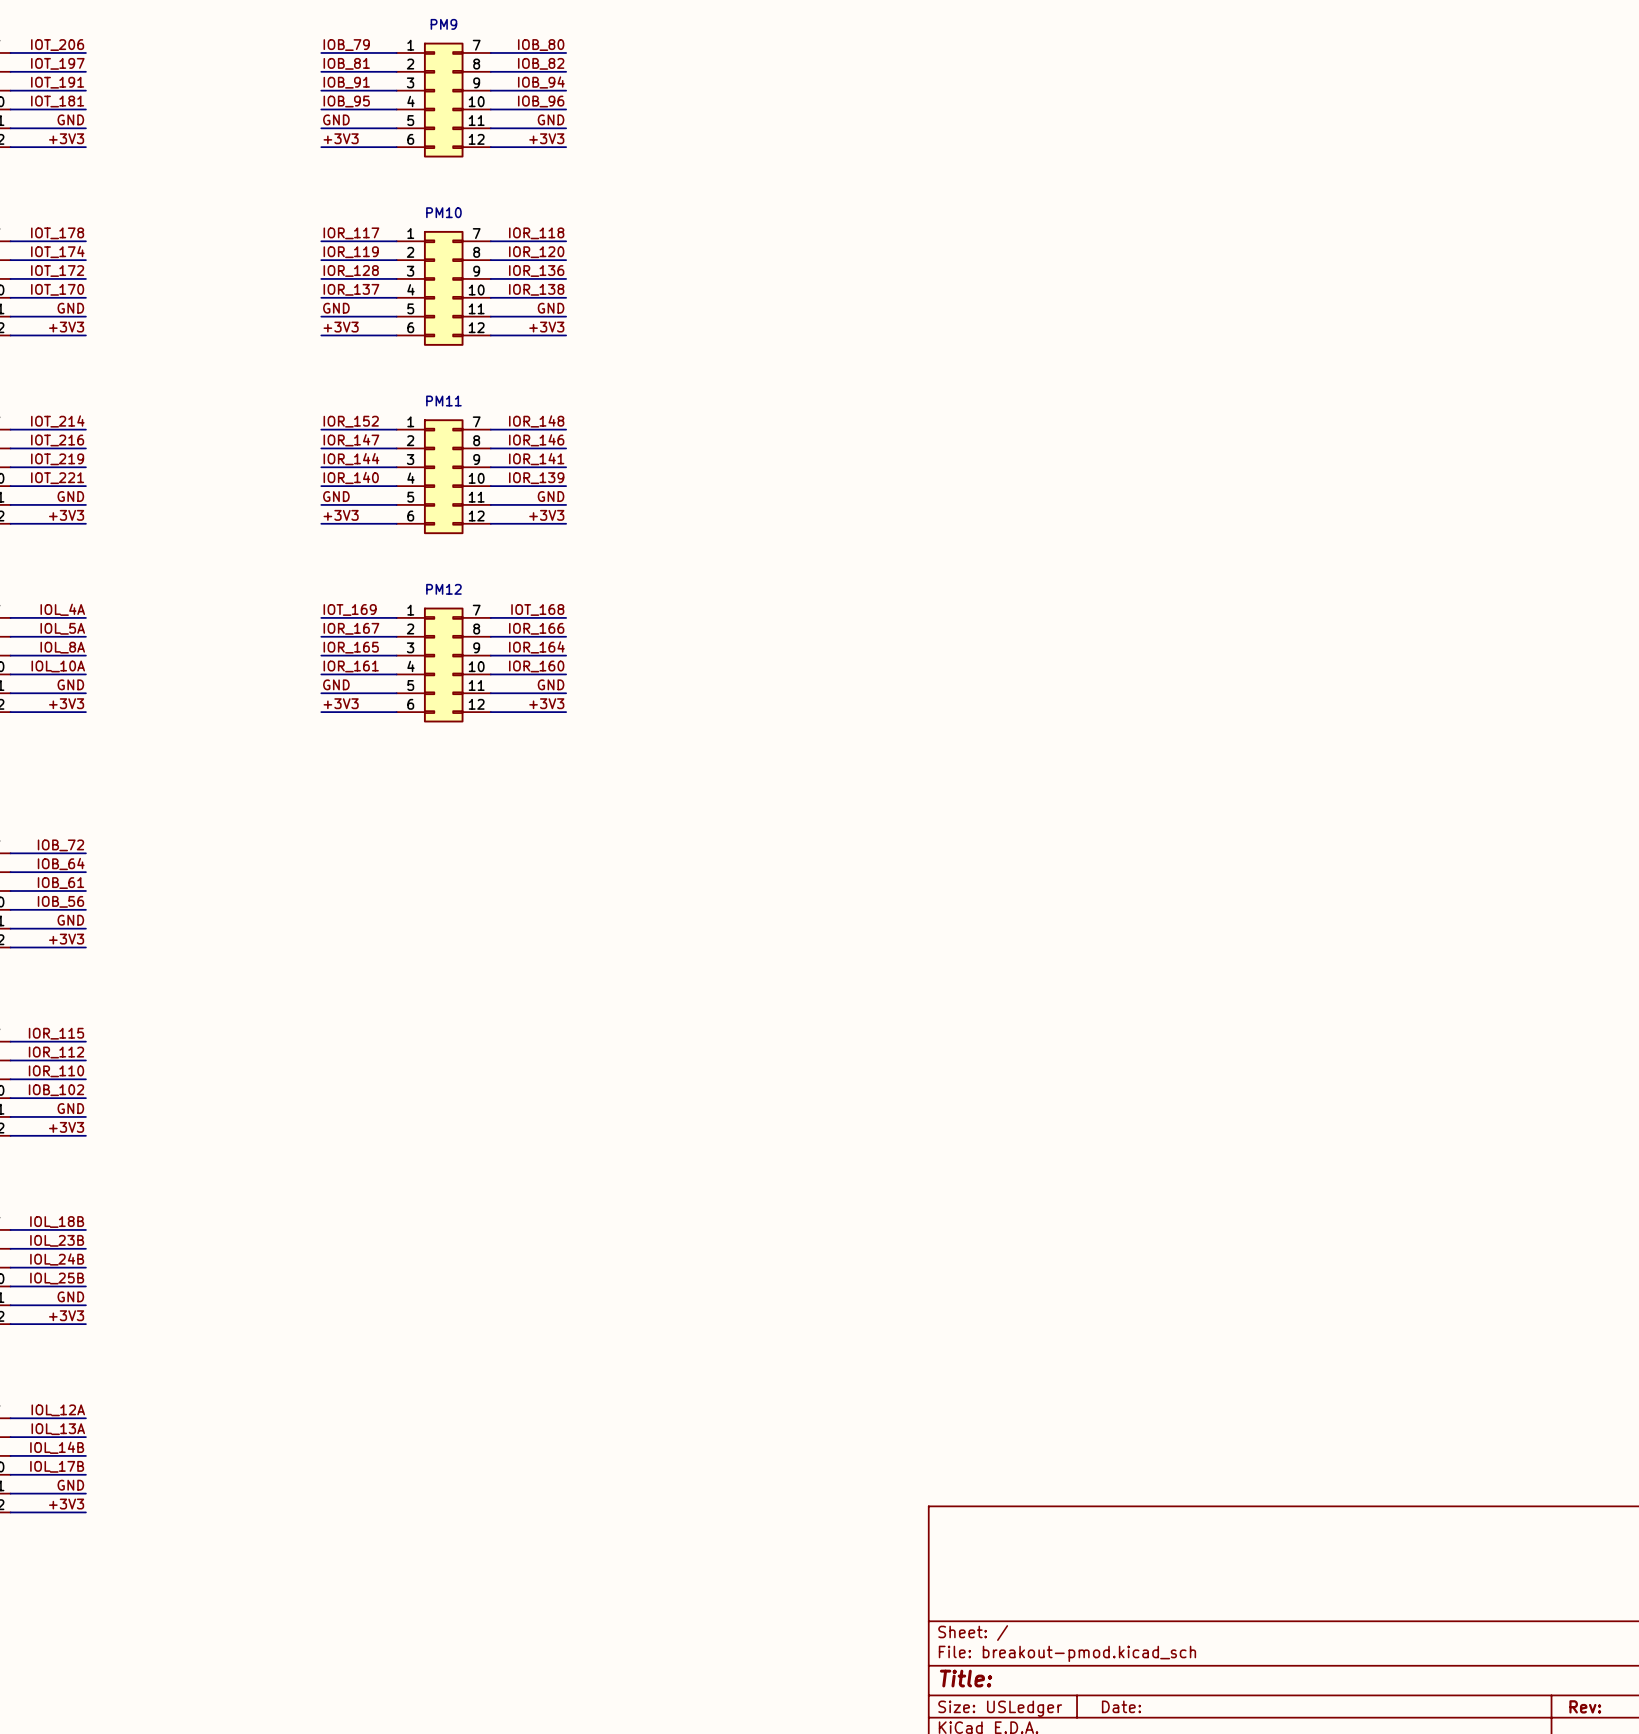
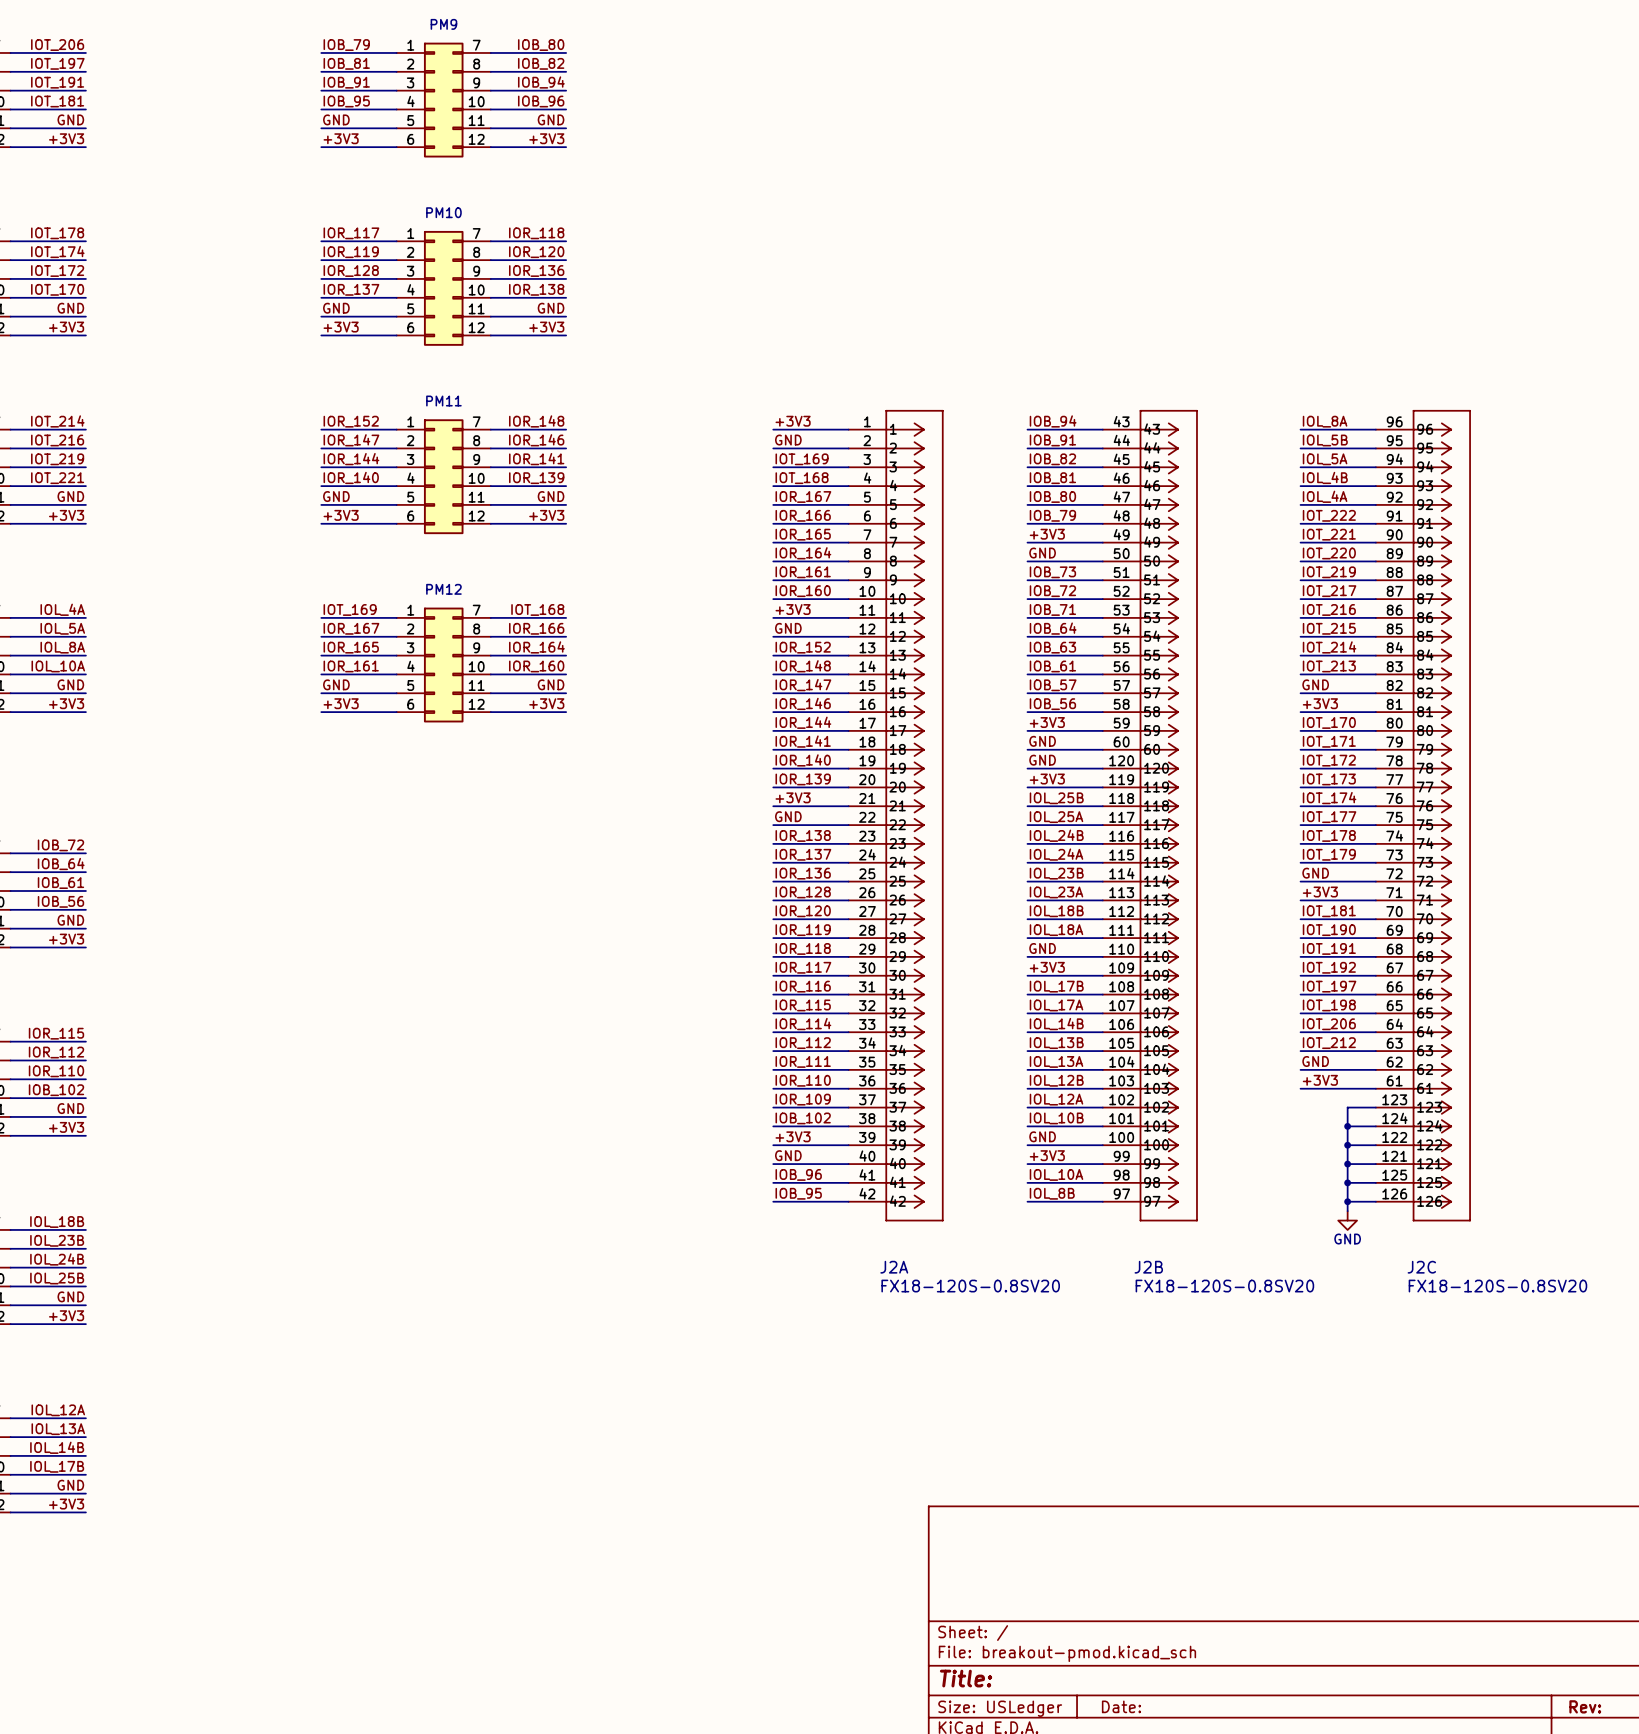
label: none -> +3V3 (793, 421)
label: none -> IOB_94 (1053, 421)
label: none -> IOL_8A (1325, 421)
wire: none -> (773, 429) (848, 429)
wire: none -> (1027, 429) (1102, 429)
wire: none -> (1300, 429) (1375, 429)
label: none -> GND (788, 440)
label: none -> IOB_91 (1052, 440)
label: none -> IOL_5B (1325, 440)
wire: none -> (773, 448) (848, 448)
wire: none -> (1027, 448) (1102, 448)
wire: none -> (1300, 448) (1375, 448)
label: none -> IOT_169 (802, 459)
label: none -> IOB_82 (1052, 459)
label: none -> IOL_5A (1325, 459)
wire: none -> (773, 467) (848, 467)
wire: none -> (1027, 467) (1102, 467)
wire: none -> (1300, 467) (1375, 467)
label: none -> IOL_4B (1325, 477)
label: none -> IOT_168 (802, 478)
label: none -> IOB_81 (1052, 478)
wire: none -> (773, 486) (848, 486)
wire: none -> (1027, 486) (1102, 486)
wire: none -> (1300, 486) (1375, 486)
label: none -> IOR_167 (803, 496)
label: none -> IOB_80 (1052, 496)
label: none -> IOL_4A (1325, 496)
wire: none -> (773, 504) (848, 504)
wire: none -> (1027, 504) (1102, 504)
wire: none -> (1300, 504) (1375, 504)
label: none -> IOR_166 (803, 515)
label: none -> IOB_79 (1052, 515)
label: none -> IOT_222 (1329, 515)
wire: none -> (773, 523) (848, 523)
wire: none -> (1027, 523) (1102, 523)
wire: none -> (1300, 523) (1375, 523)
label: none -> IOR_165 (803, 534)
label: none -> +3V3 (1047, 534)
label: none -> IOT_221 (1329, 534)
wire: none -> (773, 542) (848, 542)
wire: none -> (1027, 542) (1102, 542)
wire: none -> (1300, 542) (1375, 542)
label: none -> IOR_164 (803, 553)
label: none -> GND (1042, 553)
label: none -> IOT_220 (1329, 553)
wire: none -> (773, 561) (848, 561)
wire: none -> (1027, 561) (1102, 561)
wire: none -> (1300, 561) (1375, 561)
label: none -> IOR_161 (803, 572)
label: none -> IOB_73 (1052, 572)
label: none -> IOT_219 (1329, 572)
wire: none -> (773, 580) (848, 580)
wire: none -> (1027, 580) (1102, 580)
wire: none -> (1300, 580) (1375, 580)
label: none -> IOR_160 (803, 591)
label: none -> IOB_72 (1052, 591)
label: none -> IOT_217 (1329, 591)
wire: none -> (773, 599) (848, 599)
wire: none -> (1027, 599) (1102, 599)
wire: none -> (1300, 599) (1375, 599)
label: none -> +3V3 (793, 609)
label: none -> IOB_71 (1052, 609)
label: none -> IOT_216 (1329, 609)
wire: none -> (773, 617) (848, 617)
wire: none -> (1027, 617) (1102, 617)
wire: none -> (1300, 617) (1375, 617)
label: none -> GND (788, 628)
label: none -> IOB_64 (1053, 628)
label: none -> IOT_215 (1329, 628)
wire: none -> (773, 636) (848, 636)
wire: none -> (1027, 636) (1102, 636)
wire: none -> (1300, 636) (1375, 636)
label: none -> IOR_152 (803, 647)
label: none -> IOB_63 (1052, 647)
label: none -> IOT_214 (1329, 647)
wire: none -> (773, 655) (848, 655)
wire: none -> (1027, 655) (1102, 655)
wire: none -> (1300, 655) (1375, 655)
label: none -> IOR_148 (803, 666)
label: none -> IOB_61 (1052, 666)
label: none -> IOT_213 (1329, 666)
wire: none -> (773, 674) (848, 674)
wire: none -> (1027, 674) (1102, 674)
wire: none -> (1300, 674) (1375, 674)
label: none -> GND (1315, 684)
label: none -> IOR_147 (803, 685)
label: none -> IOB_57 (1053, 685)
wire: none -> (773, 693) (848, 693)
wire: none -> (1027, 693) (1102, 693)
wire: none -> (1300, 693) (1375, 693)
label: none -> IOR_146 (803, 703)
label: none -> +3V3 (1320, 703)
label: none -> IOB_56 (1052, 704)
wire: none -> (773, 712) (848, 712)
wire: none -> (1027, 712) (1102, 712)
wire: none -> (1300, 712) (1375, 712)
label: none -> IOR_144 (803, 722)
label: none -> +3V3 (1047, 722)
label: none -> IOT_170 (1329, 722)
wire: none -> (773, 730) (848, 730)
wire: none -> (1027, 730) (1102, 730)
wire: none -> (1300, 730) (1375, 730)
label: none -> IOR_141 (803, 741)
label: none -> GND (1042, 741)
label: none -> IOT_171 (1329, 741)
wire: none -> (773, 749) (848, 749)
wire: none -> (1027, 749) (1102, 749)
wire: none -> (1300, 749) (1375, 749)
label: none -> IOR_140 (803, 760)
label: none -> GND (1042, 760)
label: none -> IOT_172 (1329, 760)
wire: none -> (773, 768) (848, 768)
wire: none -> (1027, 768) (1102, 768)
wire: none -> (1300, 768) (1375, 768)
label: none -> IOR_139 (803, 779)
label: none -> +3V3 (1047, 779)
label: none -> IOT_173 (1329, 779)
wire: none -> (773, 787) (848, 787)
wire: none -> (1027, 787) (1102, 787)
wire: none -> (1300, 787) (1375, 787)
label: none -> +3V3 (793, 797)
label: none -> IOL_25B (1056, 798)
label: none -> IOT_174 (1329, 798)
wire: none -> (773, 806) (848, 806)
wire: none -> (1027, 806) (1102, 806)
wire: none -> (1300, 806) (1375, 806)
J2A: none -> FX18-120S-0.8SV20 (895, 815)
J2B: none -> FX18-120S-0.8SV20 (1150, 815)
J2C: none -> FX18-120S-0.8SV20 (1423, 815)
label: none -> GND (788, 816)
label: none -> IOL_25A (1056, 817)
label: none -> IOT_177 (1329, 817)
wire: none -> (773, 825) (848, 825)
wire: none -> (1027, 825) (1102, 825)
wire: none -> (1300, 825) (1375, 825)
label: none -> IOR_138 (803, 835)
label: none -> IOL_24B (1056, 835)
label: none -> IOT_178 (1329, 835)
wire: none -> (773, 843) (848, 843)
wire: none -> (1027, 843) (1102, 843)
wire: none -> (1300, 843) (1375, 843)
label: none -> IOR_137 (803, 854)
label: none -> IOL_24A (1056, 854)
label: none -> IOT_179 (1329, 854)
wire: none -> (773, 862) (848, 862)
wire: none -> (1027, 862) (1102, 862)
wire: none -> (1300, 862) (1375, 862)
label: none -> IOR_136 (803, 873)
label: none -> IOL_23B (1056, 873)
label: none -> GND (1315, 873)
wire: none -> (773, 881) (848, 881)
wire: none -> (1027, 881) (1102, 881)
wire: none -> (1300, 881) (1375, 881)
label: none -> IOR_128 (803, 892)
label: none -> IOL_23A (1056, 892)
label: none -> +3V3 (1320, 892)
wire: none -> (773, 900) (848, 900)
wire: none -> (1027, 900) (1102, 900)
wire: none -> (1300, 900) (1375, 900)
label: none -> IOR_120 (803, 911)
label: none -> IOL_18B (1056, 911)
label: none -> IOT_181 (1329, 911)
wire: none -> (773, 919) (848, 919)
wire: none -> (1027, 919) (1102, 919)
wire: none -> (1300, 919) (1375, 919)
label: none -> IOR_119 (803, 930)
label: none -> IOL_18A (1056, 930)
label: none -> IOT_190 (1329, 930)
wire: none -> (773, 938) (848, 938)
wire: none -> (1027, 938) (1102, 938)
wire: none -> (1300, 938) (1375, 938)
label: none -> IOR_118 (803, 948)
label: none -> GND (1042, 948)
label: none -> IOT_191 (1329, 948)
wire: none -> (773, 956) (848, 956)
wire: none -> (1027, 956) (1102, 956)
wire: none -> (1300, 956) (1375, 956)
label: none -> IOR_117 (803, 967)
label: none -> +3V3 (1047, 967)
label: none -> IOT_192 (1329, 967)
wire: none -> (773, 975) (848, 975)
wire: none -> (1027, 975) (1102, 975)
wire: none -> (1300, 975) (1375, 975)
label: none -> IOR_116 (803, 986)
label: none -> IOL_17B (1056, 986)
label: none -> IOT_197 (1329, 986)
wire: none -> (773, 994) (848, 994)
wire: none -> (1027, 994) (1102, 994)
wire: none -> (1300, 994) (1375, 994)
label: none -> IOR_115 (803, 1005)
label: none -> IOL_17A (1056, 1005)
label: none -> IOT_198 (1329, 1005)
wire: none -> (773, 1013) (848, 1013)
wire: none -> (1027, 1013) (1102, 1013)
wire: none -> (1300, 1013) (1375, 1013)
label: none -> IOR_114 (803, 1024)
label: none -> IOL_14B (1056, 1024)
label: none -> IOT_206 (1329, 1024)
wire: none -> (773, 1032) (848, 1032)
wire: none -> (1027, 1032) (1102, 1032)
wire: none -> (1300, 1032) (1375, 1032)
label: none -> IOR_112 (803, 1043)
label: none -> IOL_13B (1056, 1043)
label: none -> IOT_212 (1329, 1043)
wire: none -> (773, 1051) (848, 1051)
wire: none -> (1027, 1051) (1102, 1051)
wire: none -> (1300, 1051) (1375, 1051)
label: none -> IOR_111 (803, 1061)
label: none -> IOL_13A (1056, 1061)
label: none -> GND (1315, 1061)
wire: none -> (773, 1069) (848, 1069)
wire: none -> (1027, 1069) (1102, 1069)
wire: none -> (1300, 1069) (1375, 1069)
label: none -> IOR_110 (803, 1080)
label: none -> IOL_12B (1056, 1080)
label: none -> +3V3 (1320, 1080)
wire: none -> (773, 1088) (848, 1088)
wire: none -> (1027, 1088) (1102, 1088)
wire: none -> (1300, 1088) (1375, 1088)
label: none -> IOR_109 (803, 1099)
label: none -> IOL_12A (1056, 1099)
wire: none -> (773, 1107) (848, 1107)
wire: none -> (1027, 1107) (1102, 1107)
wire: none -> (1375, 1107) (1347, 1107) (1347, 1211)
label: none -> IOB_102 (803, 1118)
label: none -> IOL_10B (1056, 1118)
wire: none -> (773, 1126) (848, 1126)
wire: none -> (1027, 1126) (1102, 1126)
wire: none -> (1347, 1126) (1375, 1126)
junction: none -> (1347, 1126)
label: none -> +3V3 (793, 1136)
label: none -> GND (1042, 1136)
wire: none -> (773, 1145) (848, 1145)
wire: none -> (1027, 1145) (1102, 1145)
wire: none -> (1347, 1145) (1375, 1145)
junction: none -> (1347, 1145)
label: none -> GND (788, 1155)
label: none -> +3V3 (1047, 1155)
wire: none -> (773, 1164) (848, 1164)
wire: none -> (1027, 1164) (1102, 1164)
wire: none -> (1347, 1164) (1375, 1164)
junction: none -> (1347, 1164)
label: none -> IOB_96 (798, 1174)
label: none -> IOL_10A (1056, 1174)
wire: none -> (773, 1182) (848, 1182)
wire: none -> (1027, 1182) (1102, 1182)
wire: none -> (1347, 1182) (1375, 1182)
junction: none -> (1347, 1182)
label: none -> IOB_95 (798, 1193)
label: none -> IOL_8B (1052, 1193)
wire: none -> (773, 1201) (848, 1201)
wire: none -> (1027, 1201) (1102, 1201)
wire: none -> (1347, 1201) (1375, 1201)
junction: none -> (1347, 1201)
power symbol: none -> GND (1347, 1220)

